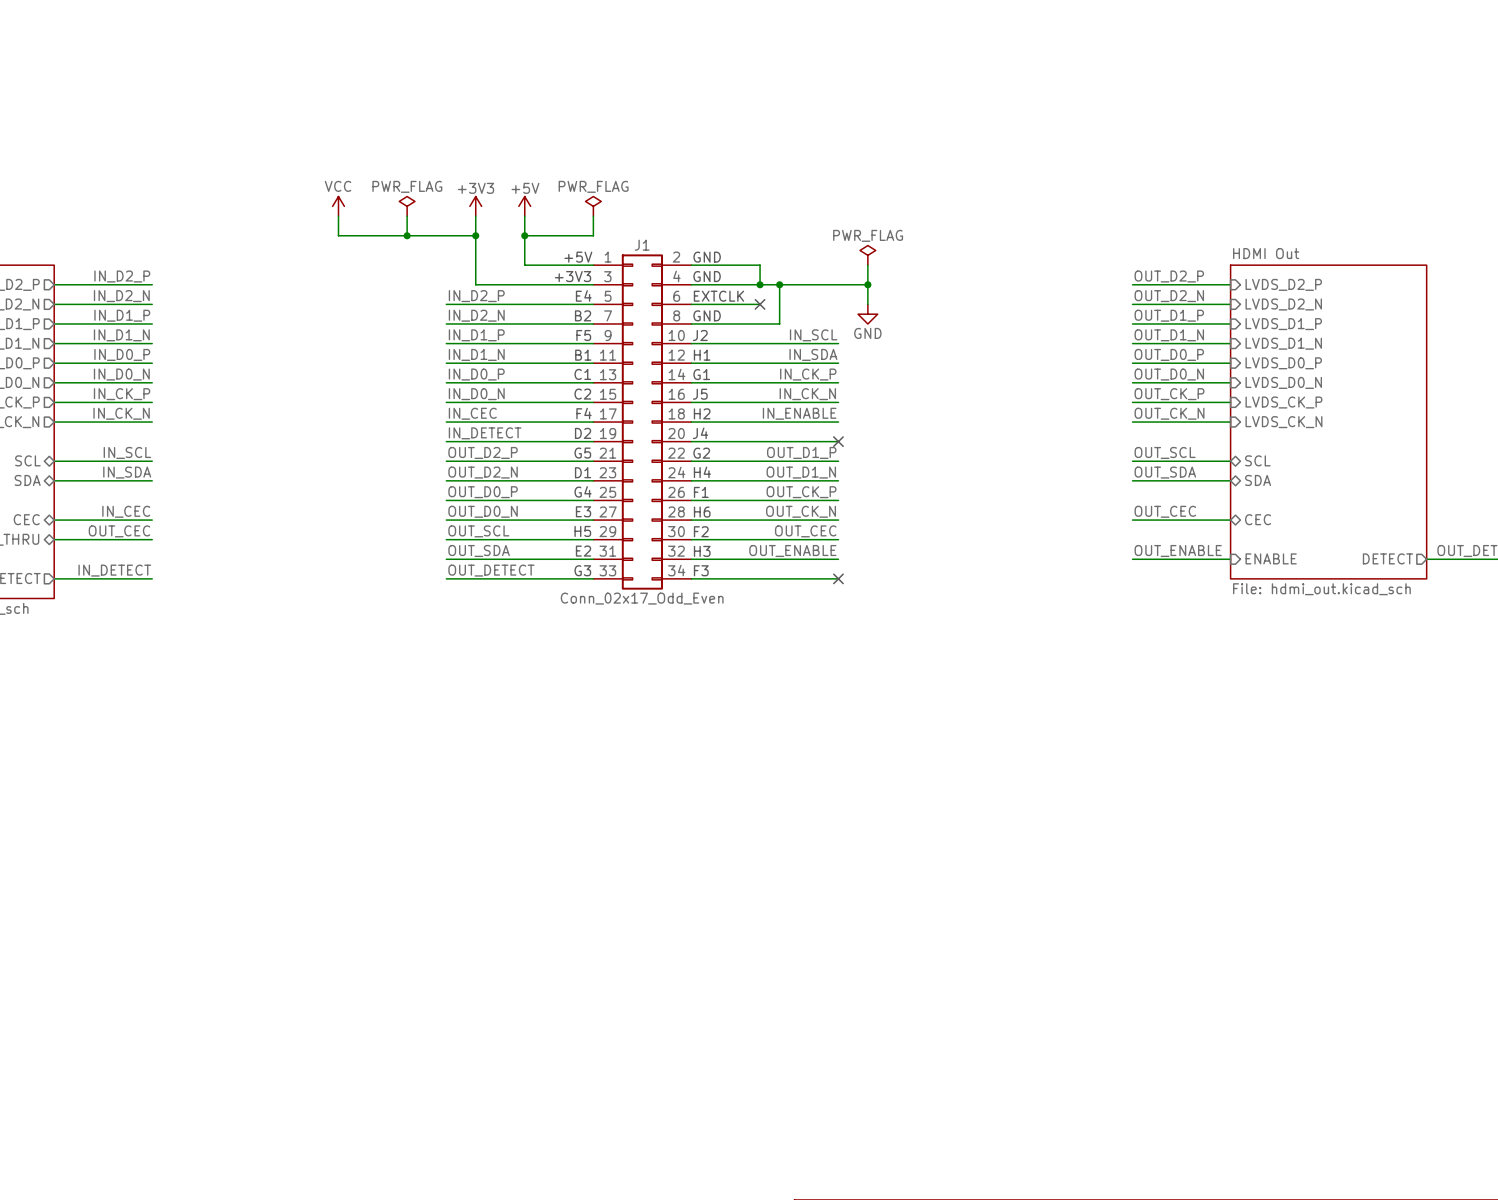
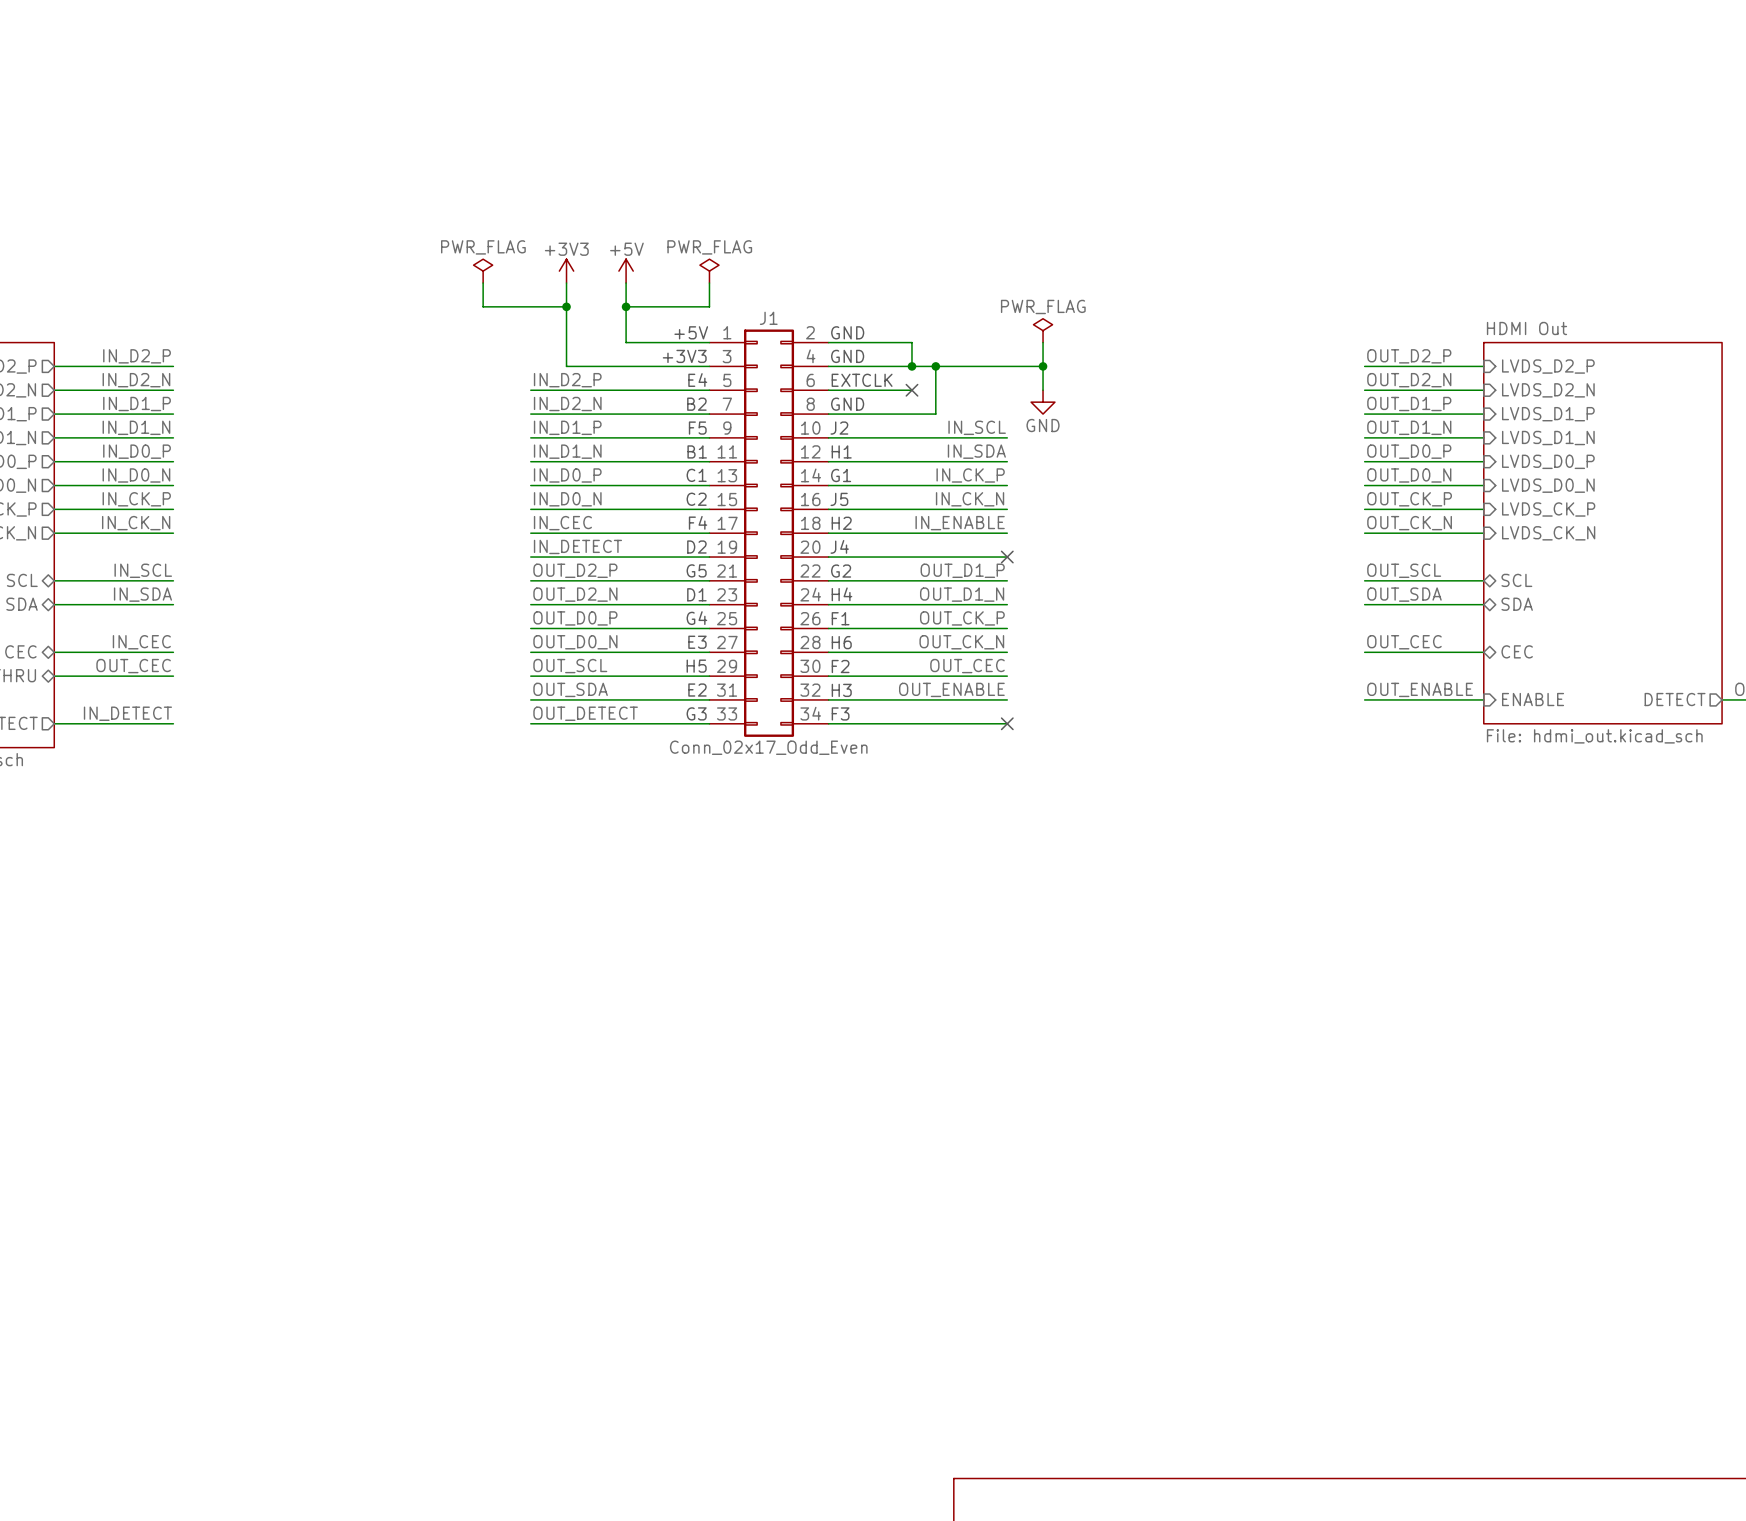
power symbol: VCC (338, 206) -> none
wire: (338, 216) (338, 235) (407, 235) -> none
junction: (407, 235) -> none

